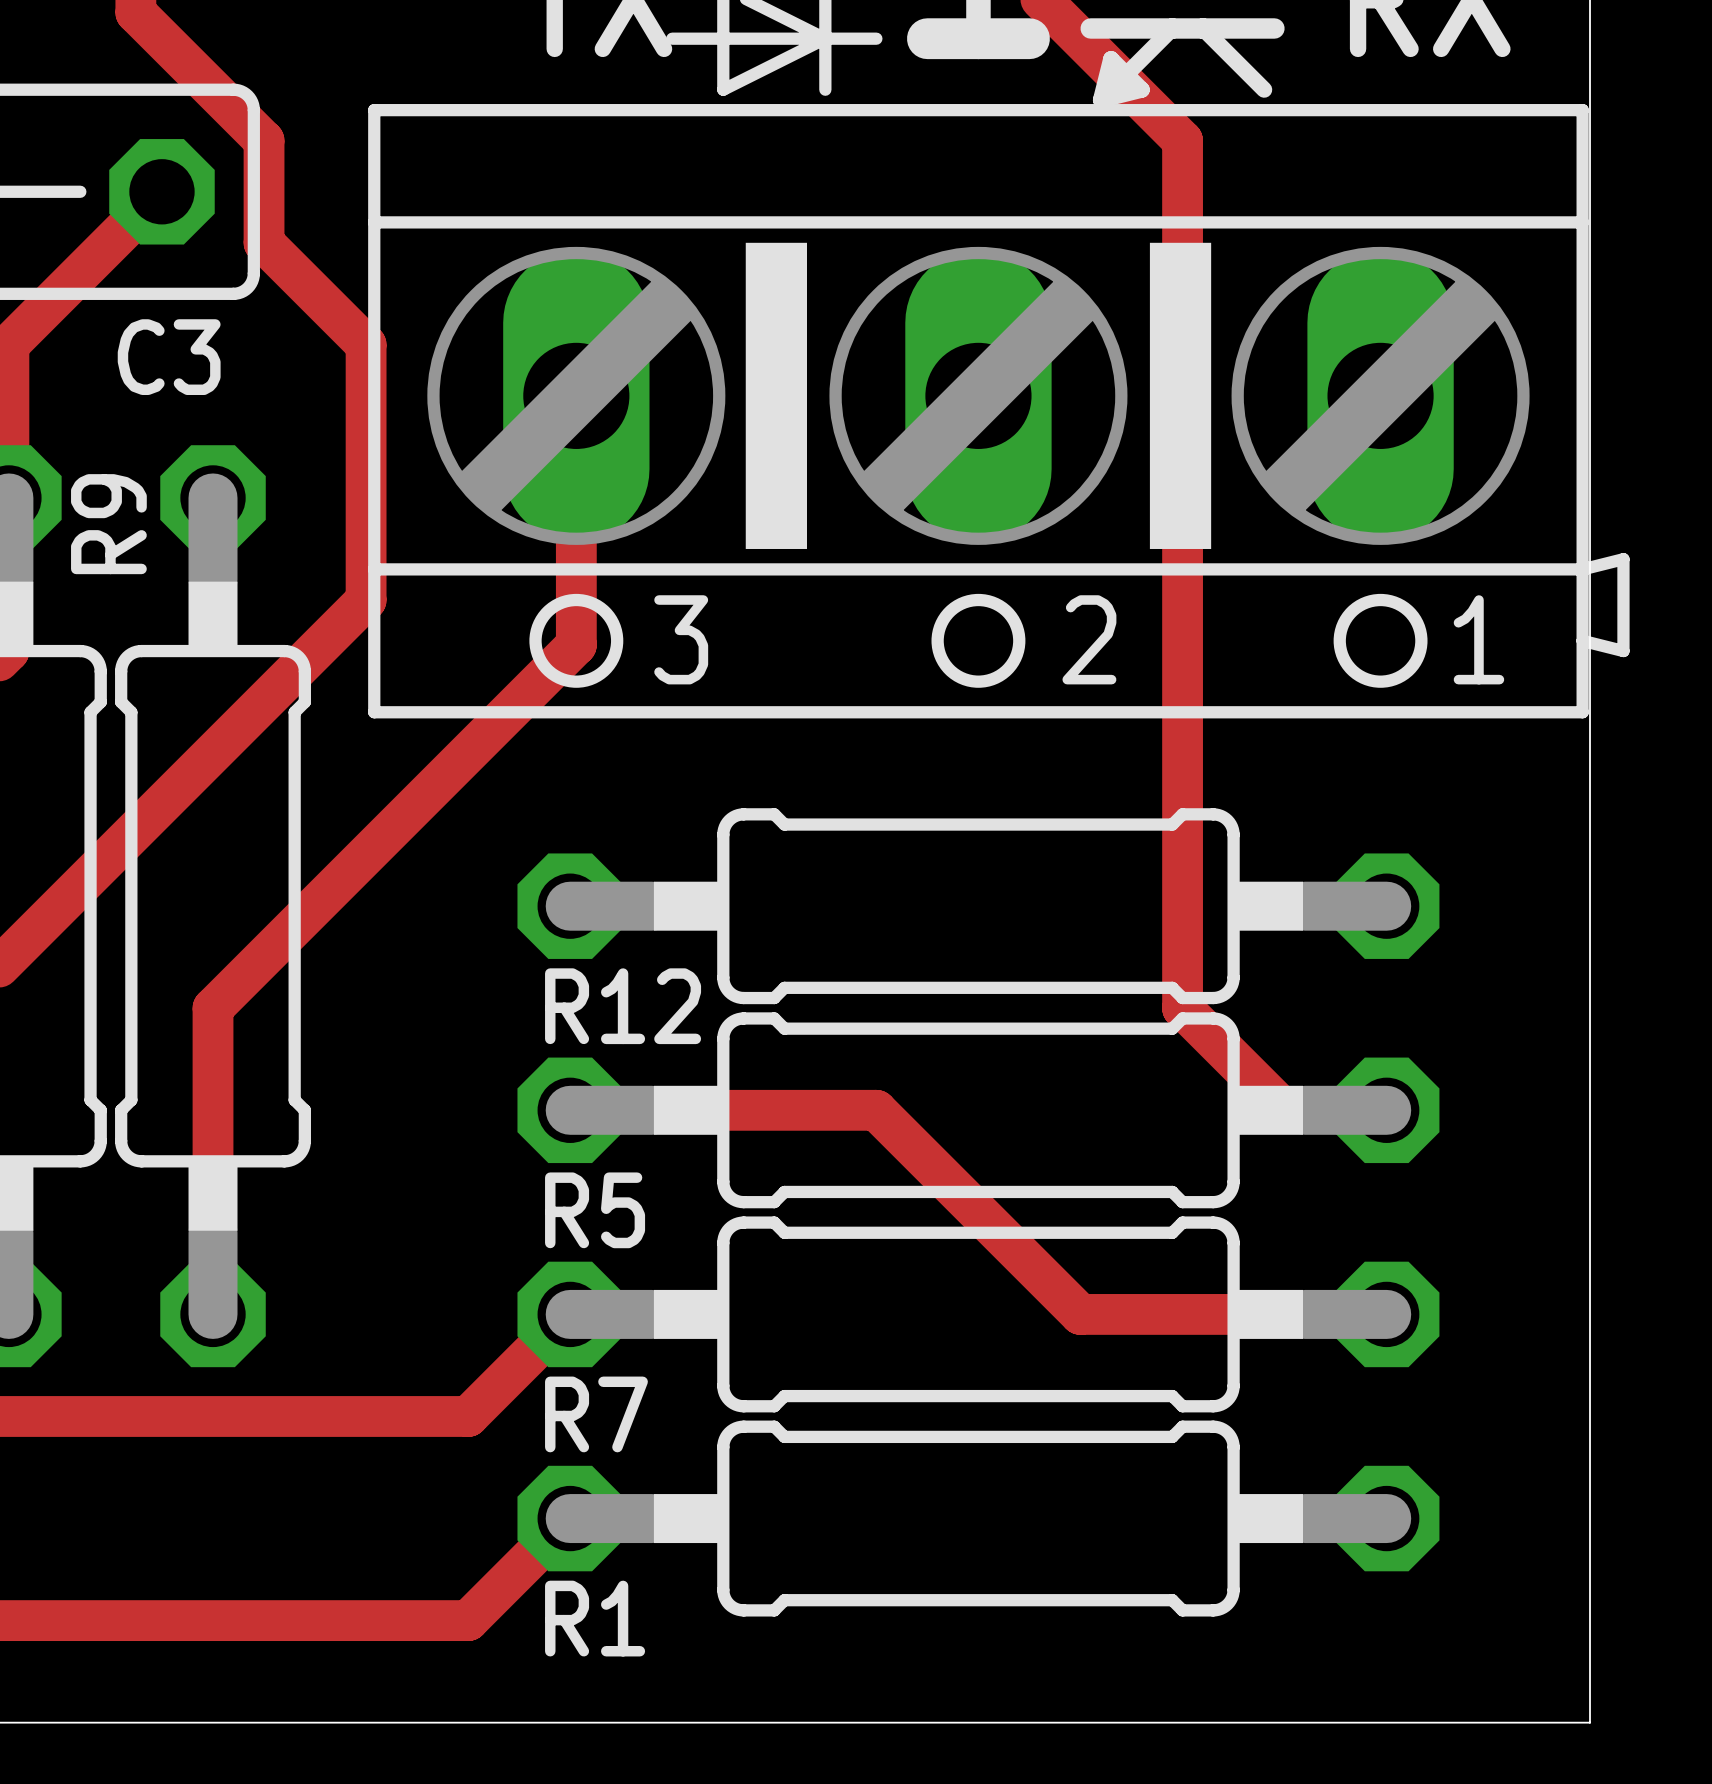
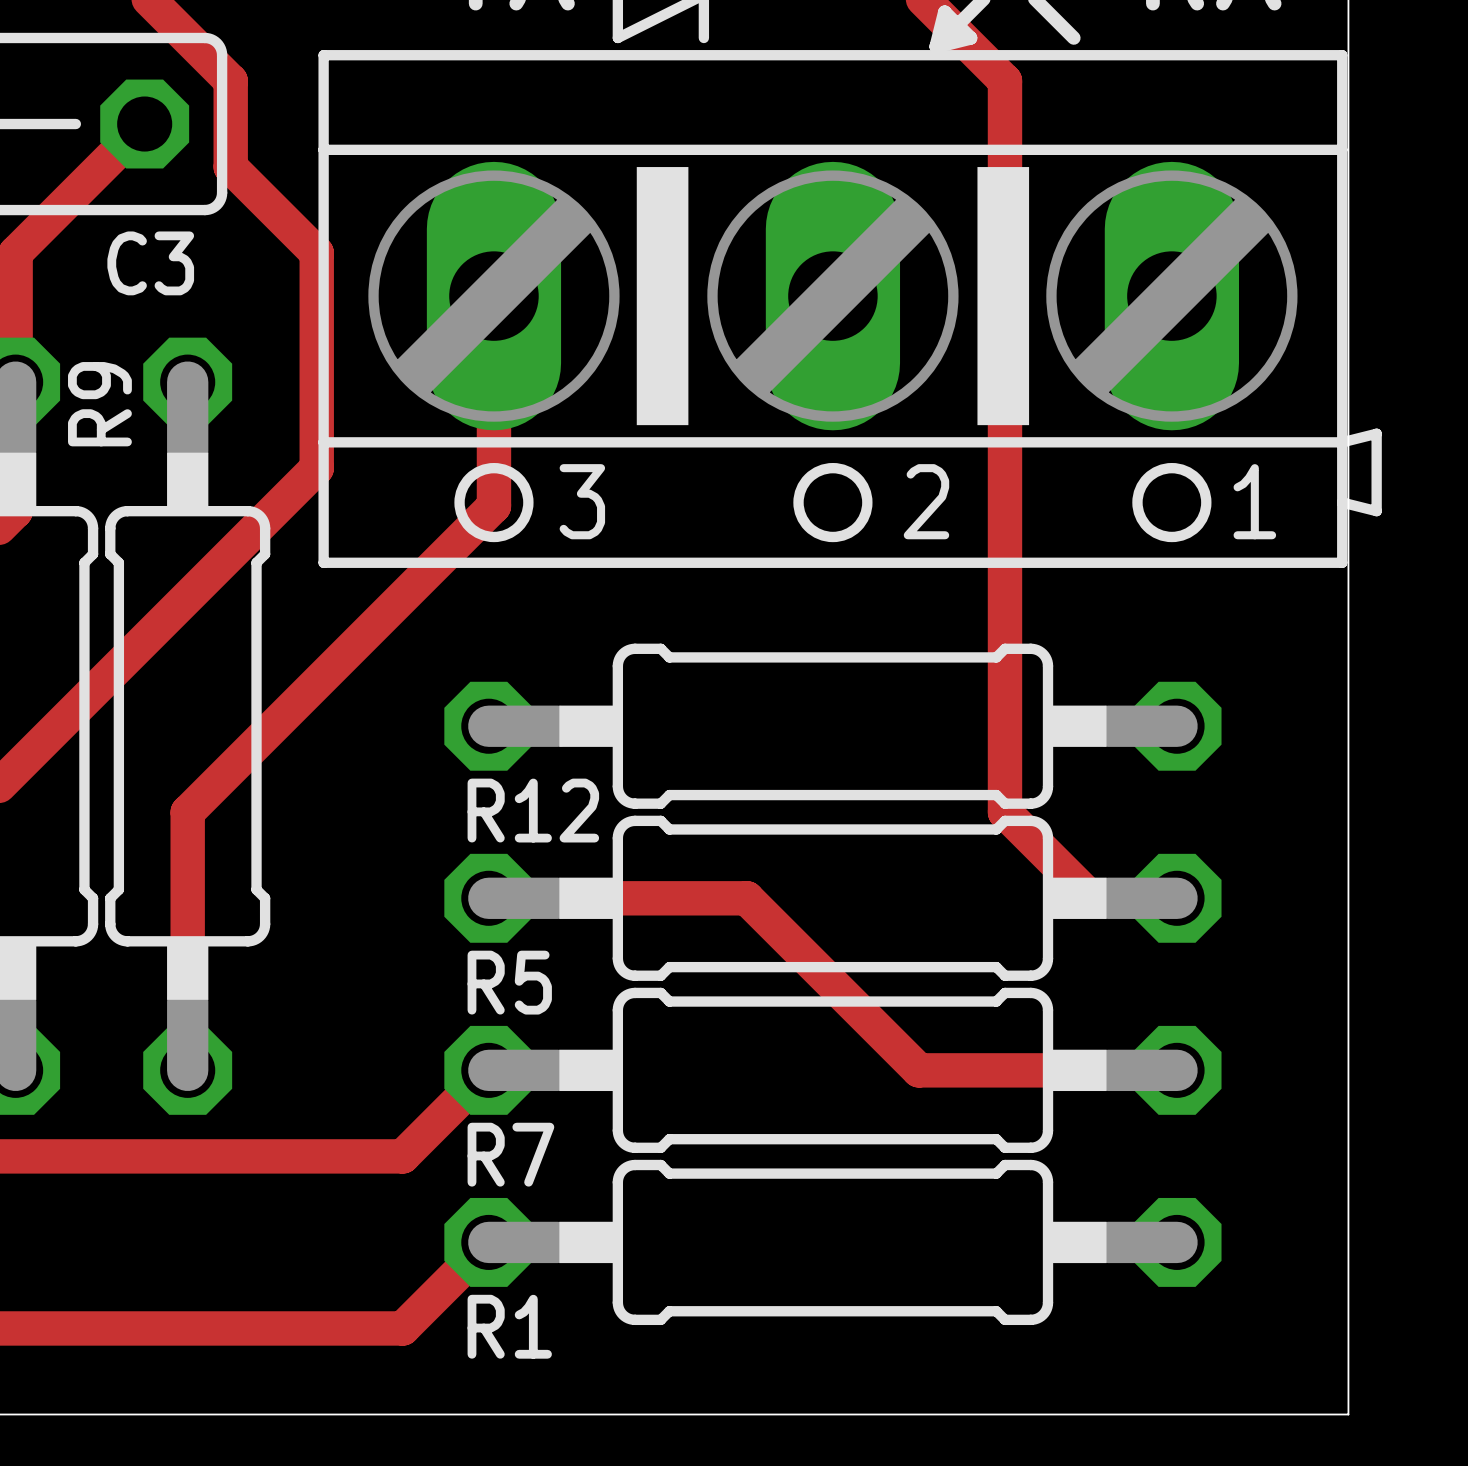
part footprint: [368, 104, 1630, 719] -> [318, 50, 1382, 568]

